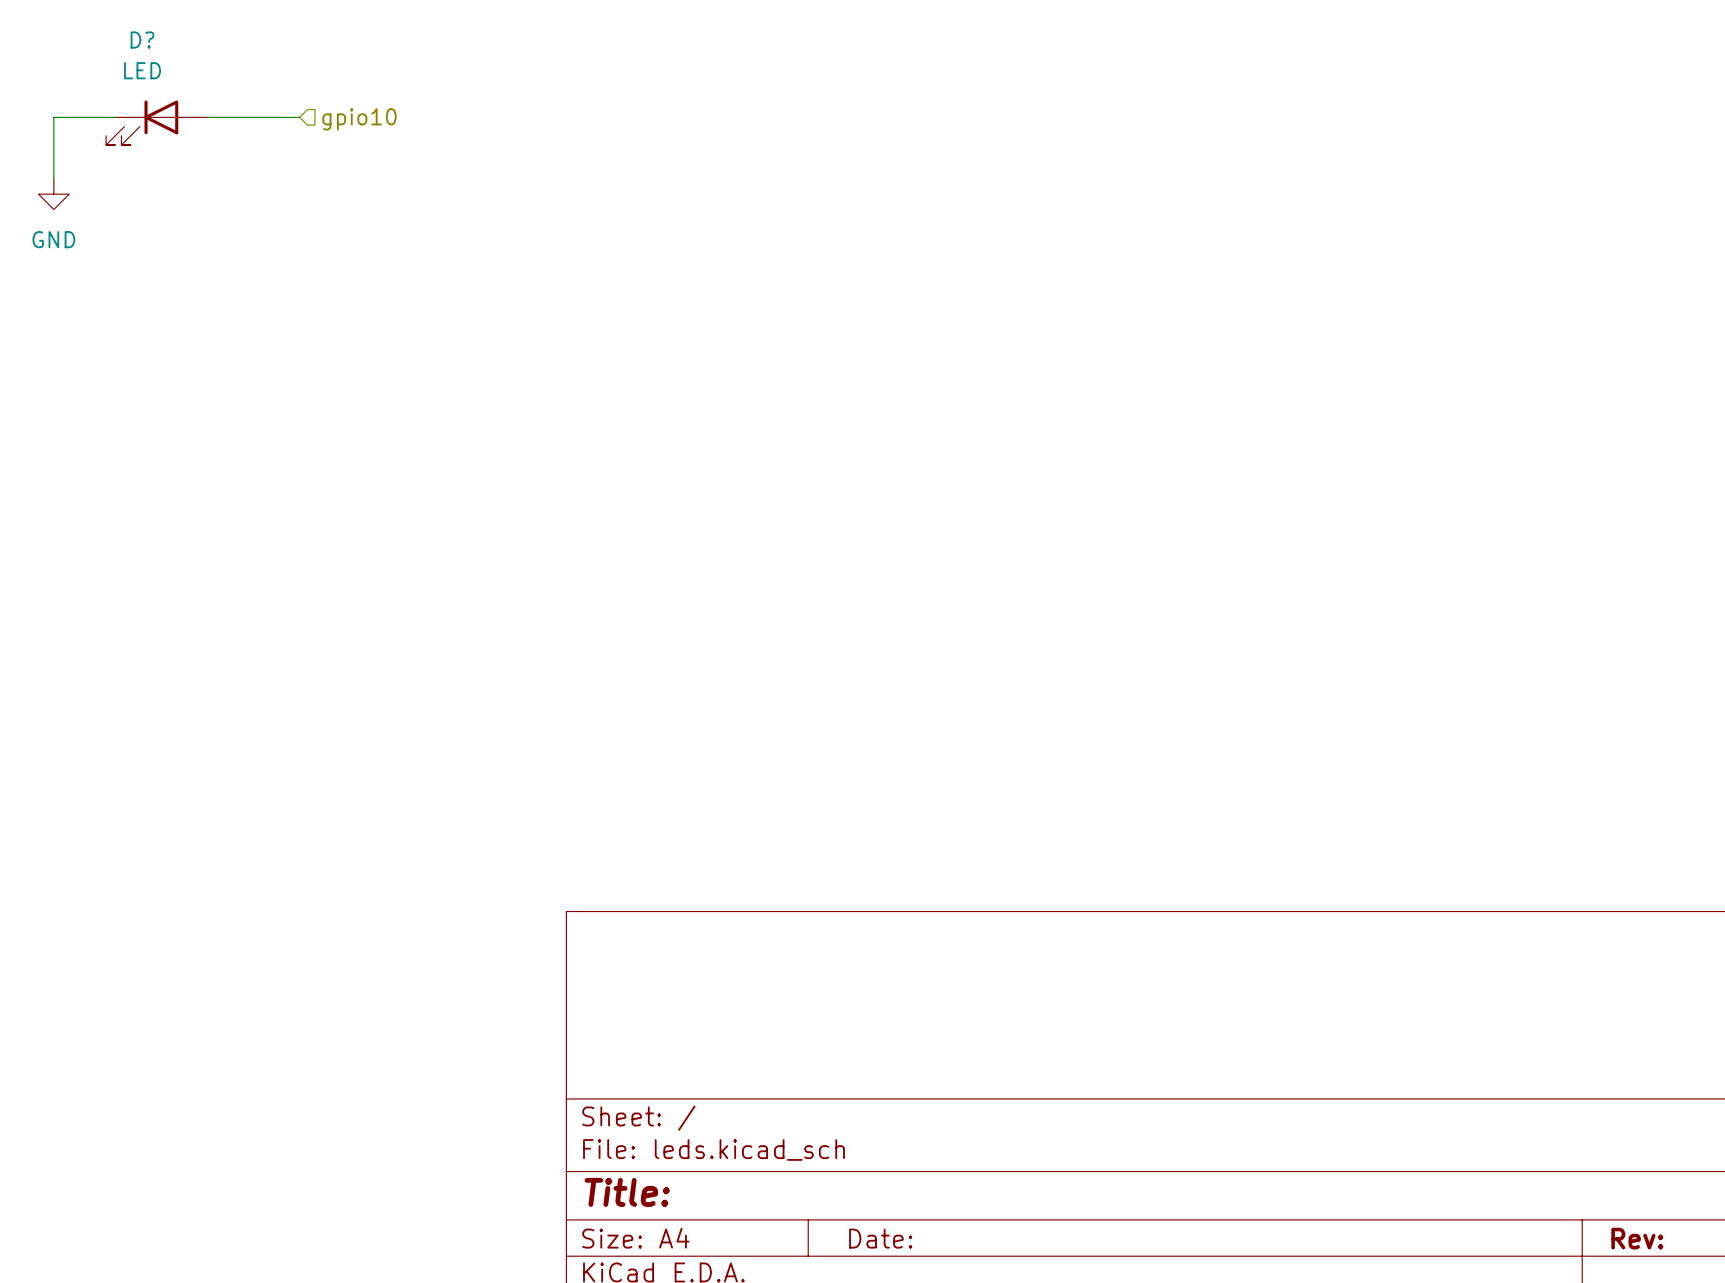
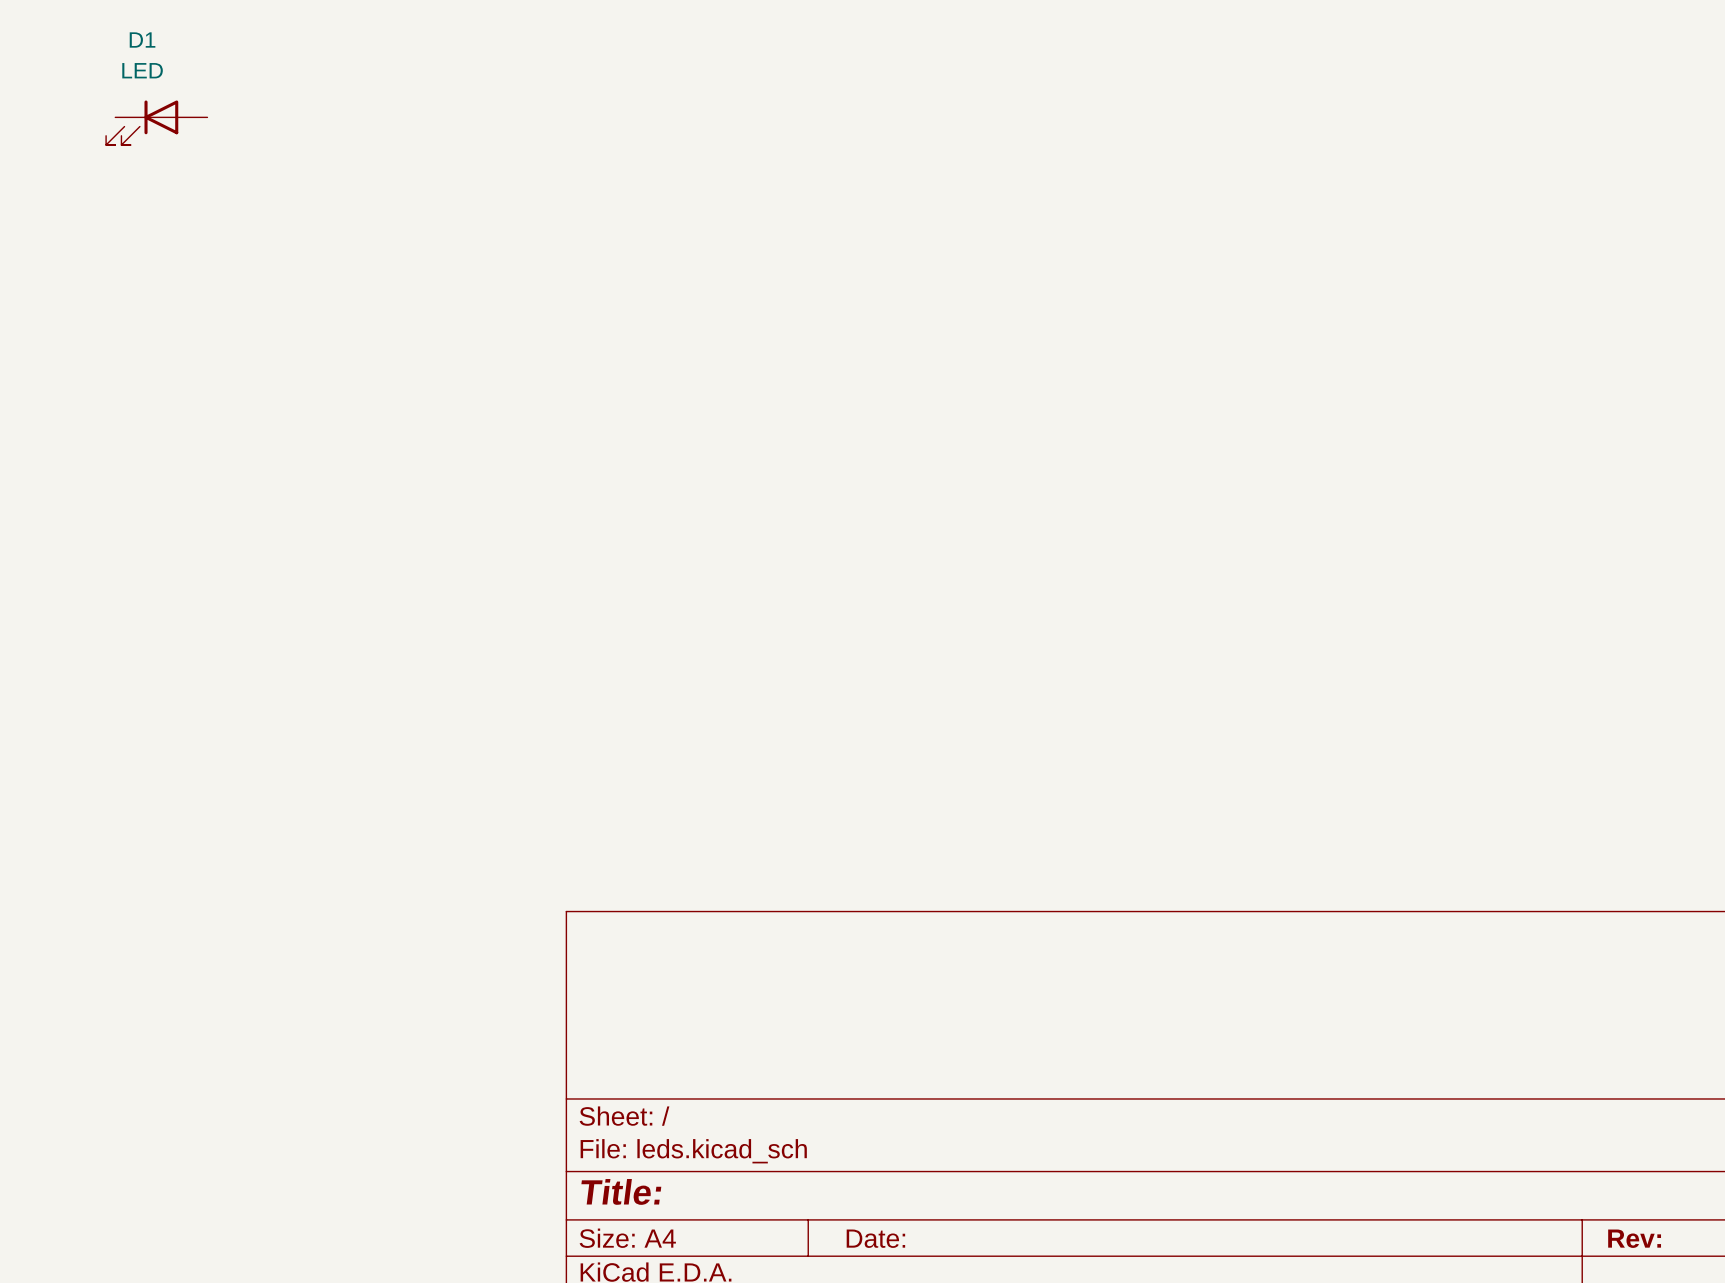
D? name: D? (142, 40) -> D1 (142, 40)
wire: (115, 117) (53, 117) (53, 178) -> none
wire: (207, 117) (299, 117) -> none
hierarchical label: gpio10 (359, 119) -> none
power symbol: GND (53, 194) -> none

